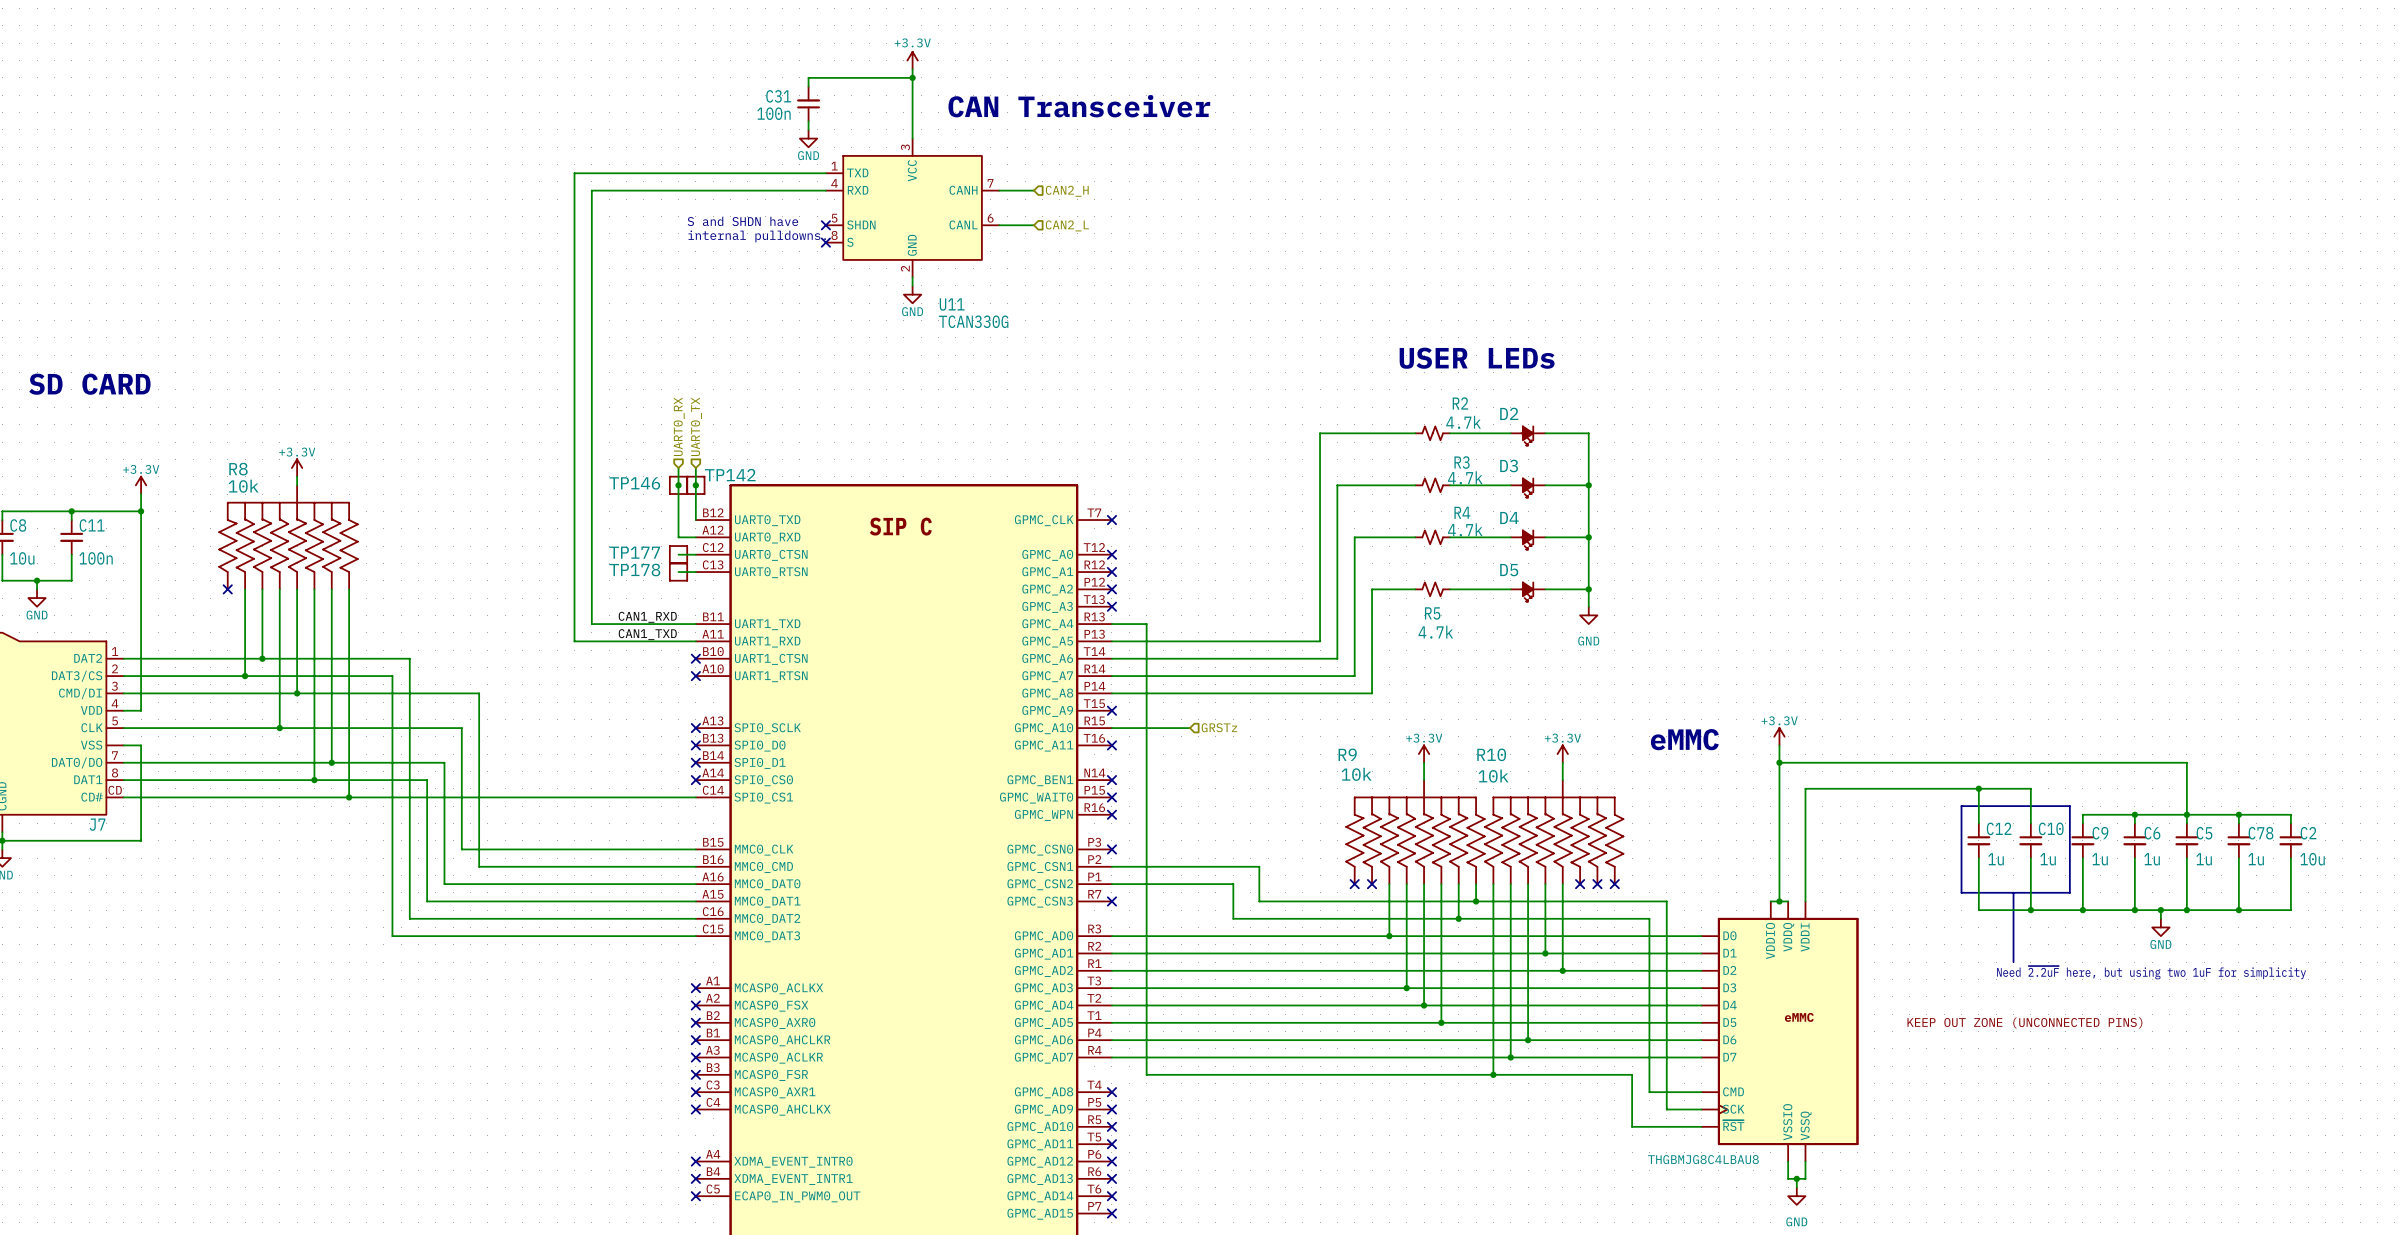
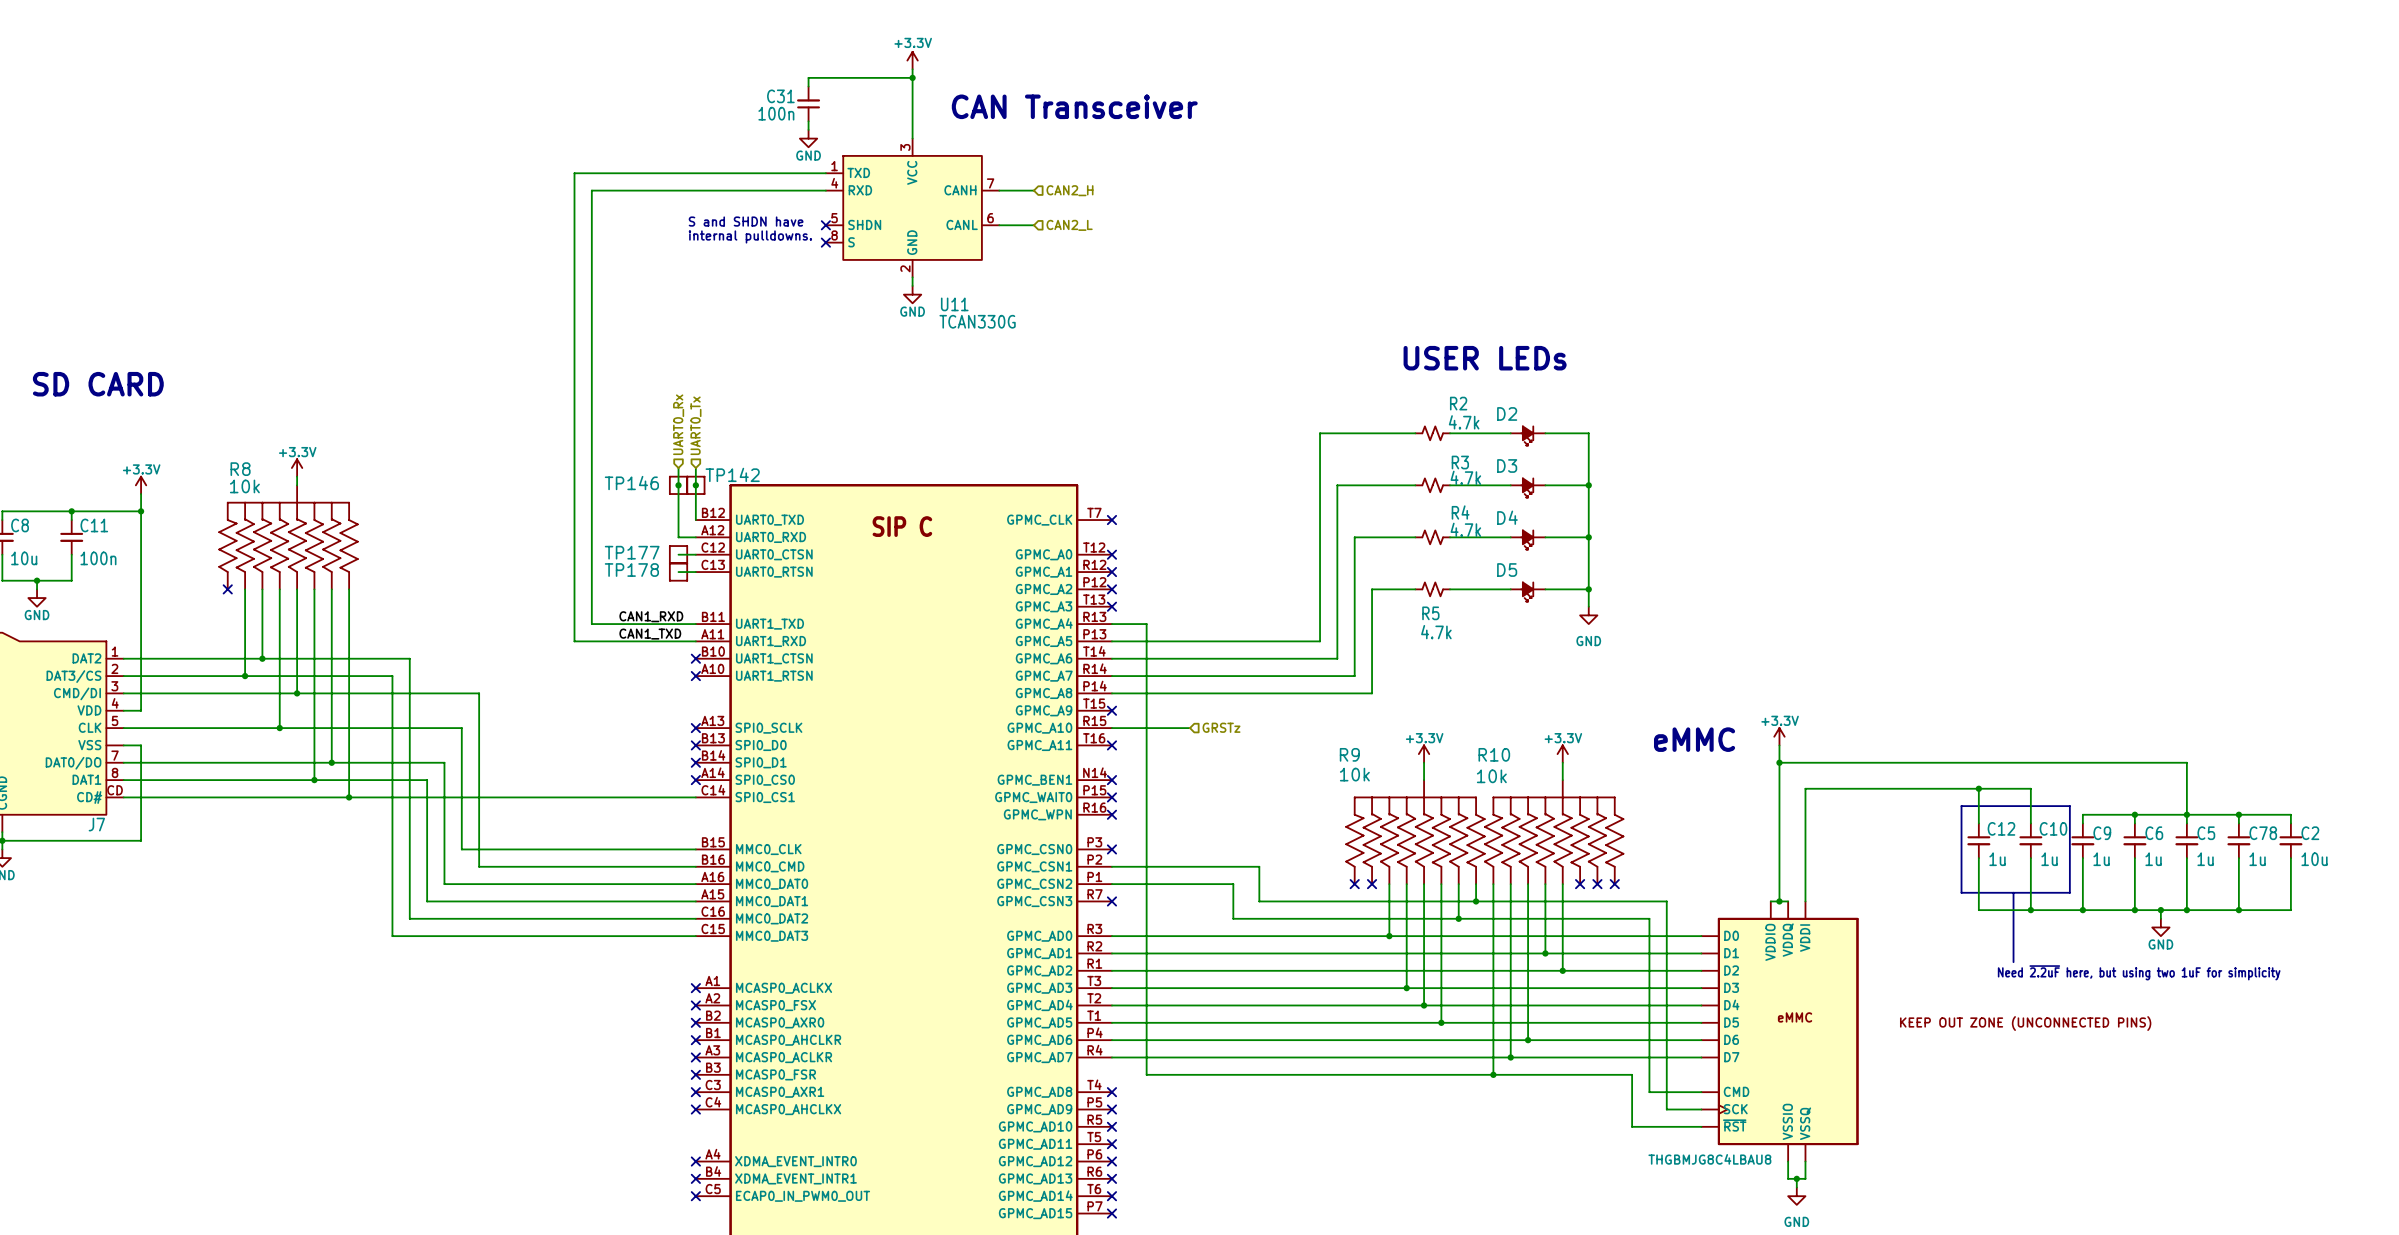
hierarchical label: UART0_RX (679, 426) -> UART0_Rx (678, 424)
hierarchical label: UART0_TX (696, 426) -> UART0_Tx (695, 425)

